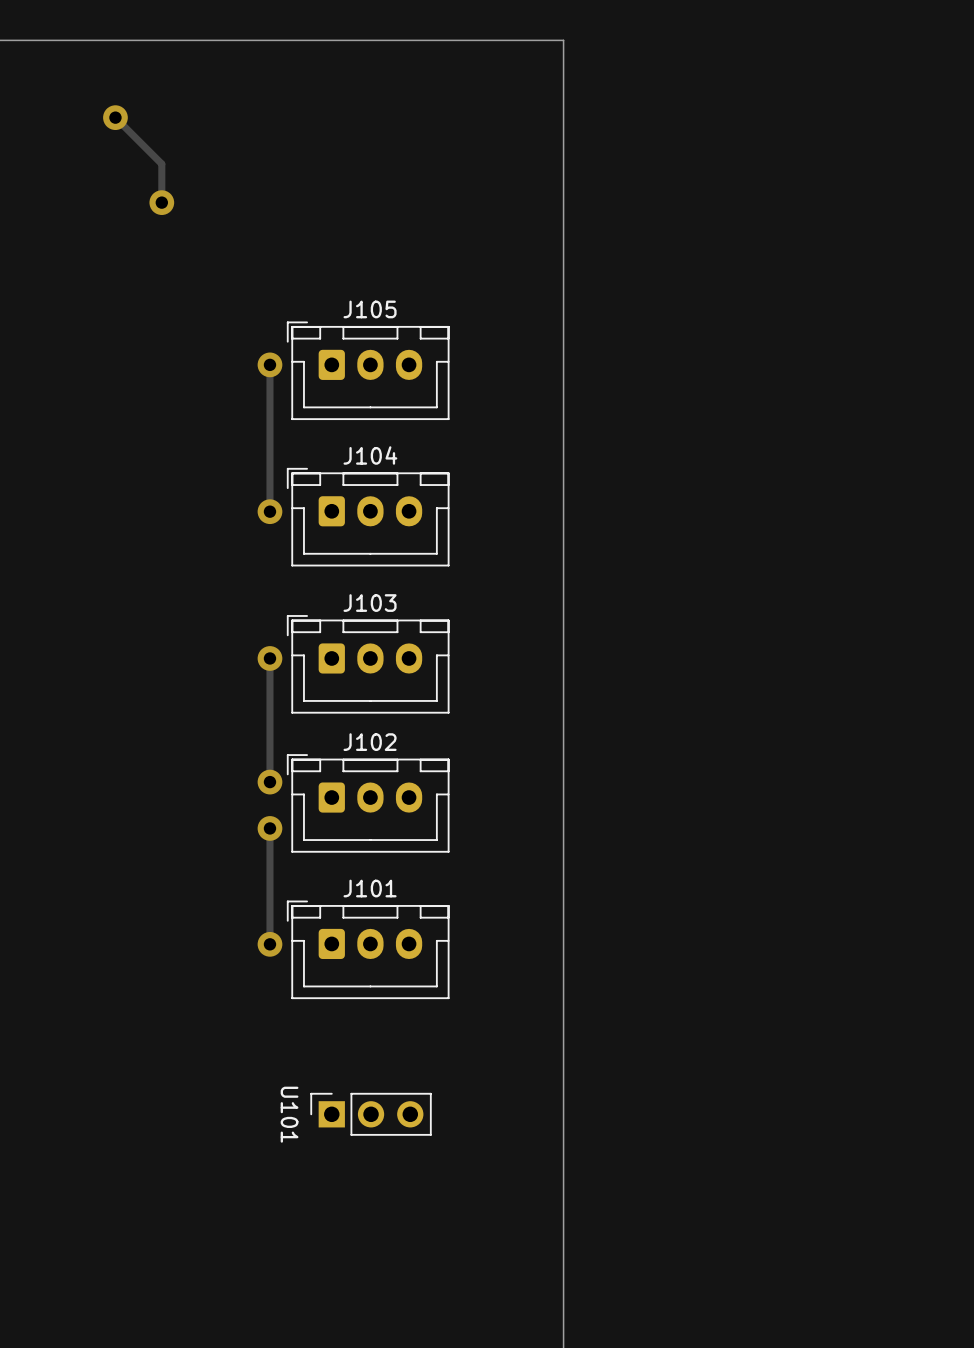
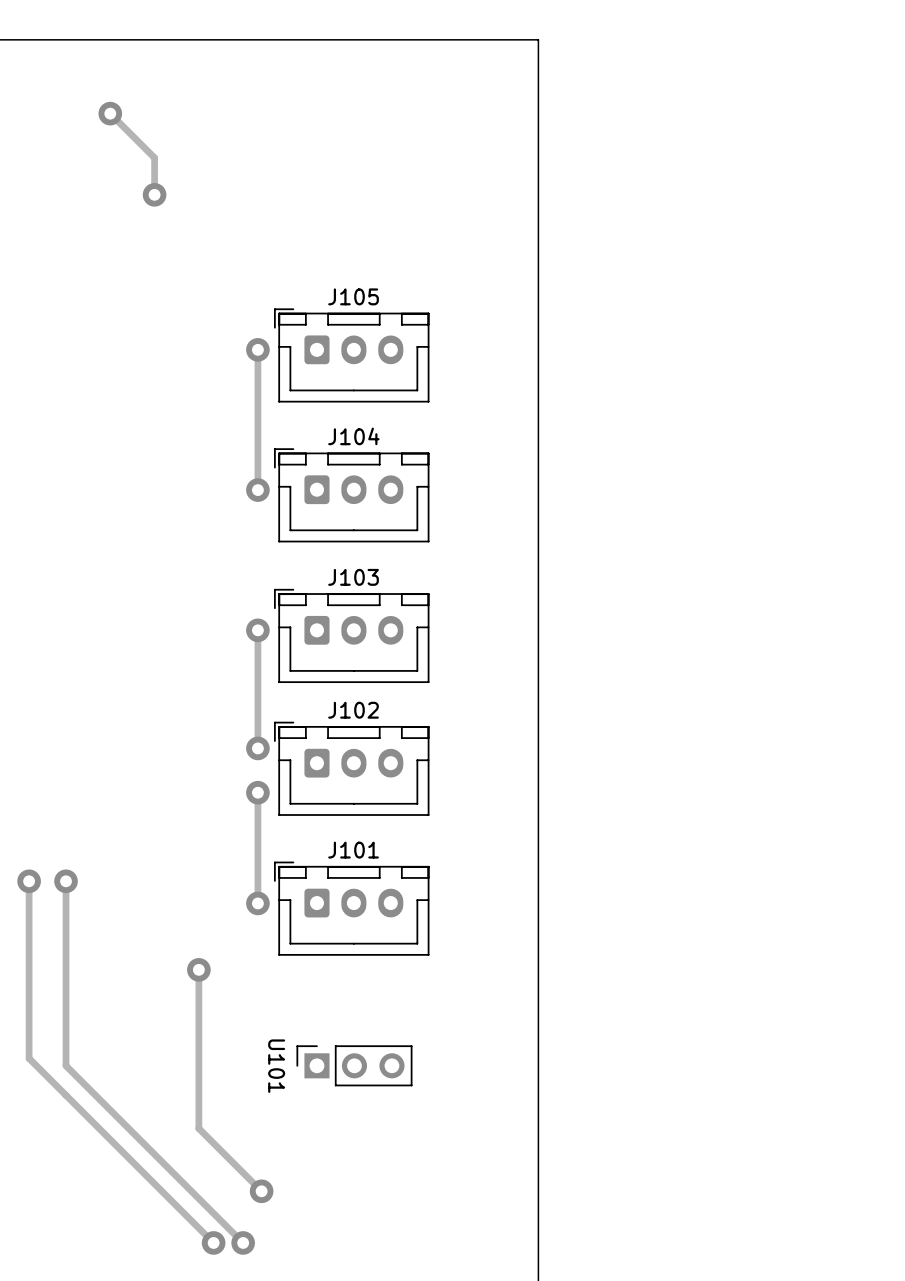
track: none -> (29, 881) (29, 1058) (213, 1242)
via: none -> (29, 881)
track: none -> (66, 881) (66, 1065) (243, 1242)
via: none -> (66, 881)
track: none -> (198, 969) (198, 1128) (261, 1191)
via: none -> (198, 969)
via: none -> (261, 1191)
via: none -> (213, 1242)
via: none -> (243, 1242)

